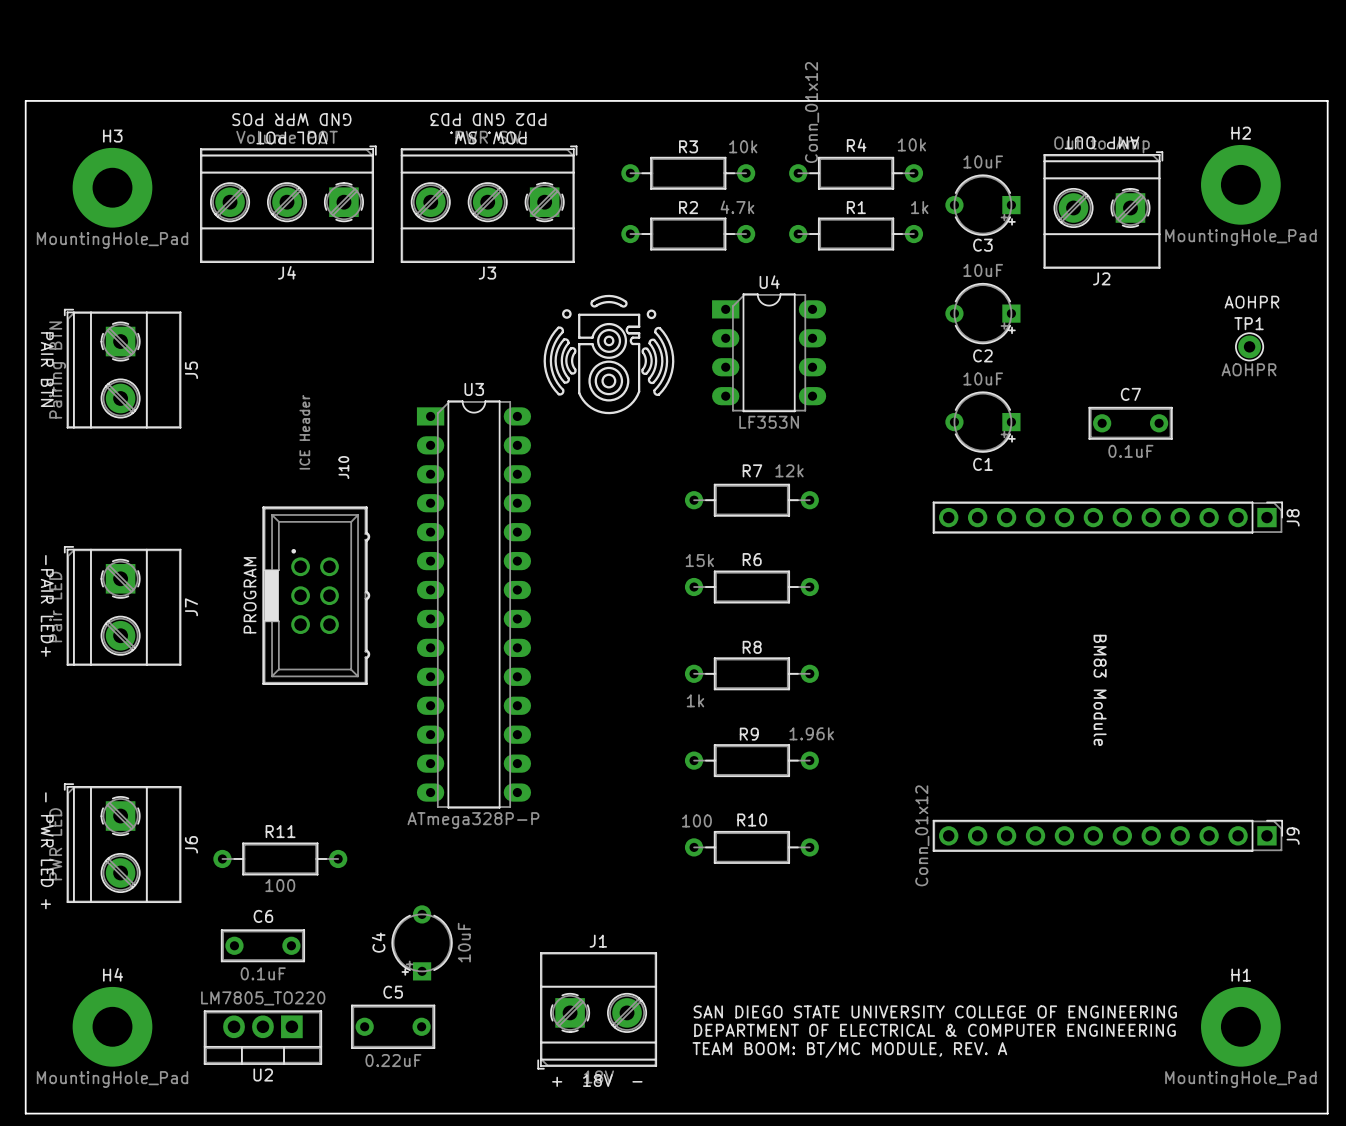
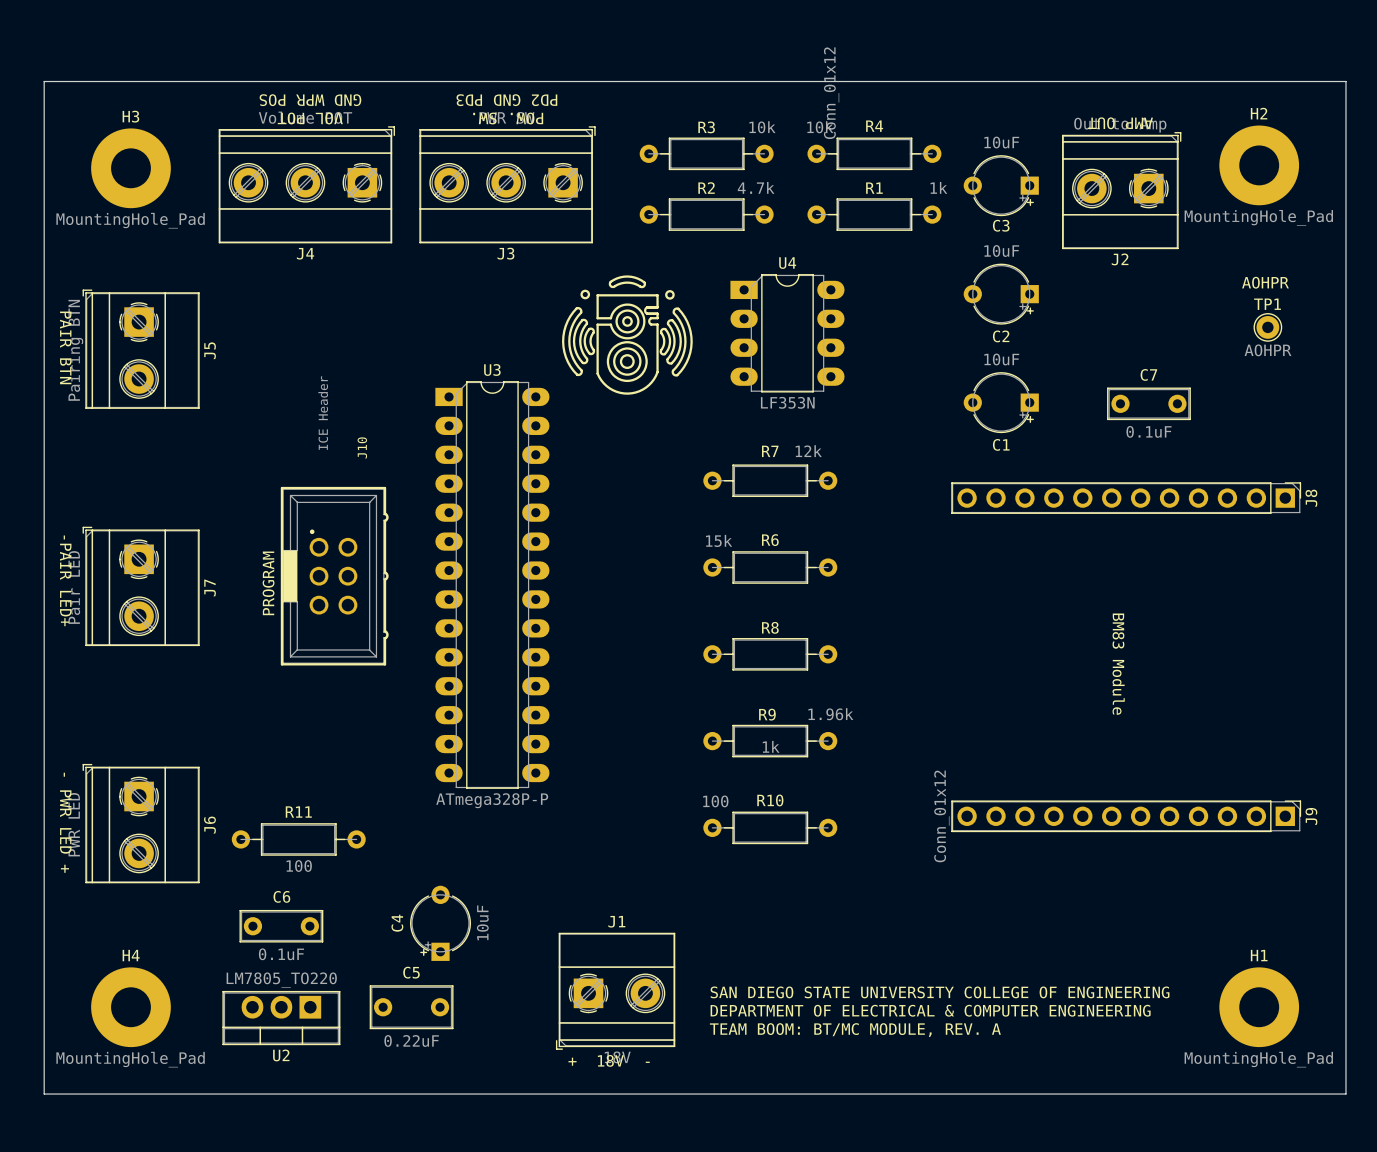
R4 value position: 10k (911, 144) -> 10k (820, 127)
R8 value position: 1k (695, 700) -> 1k (771, 746)

